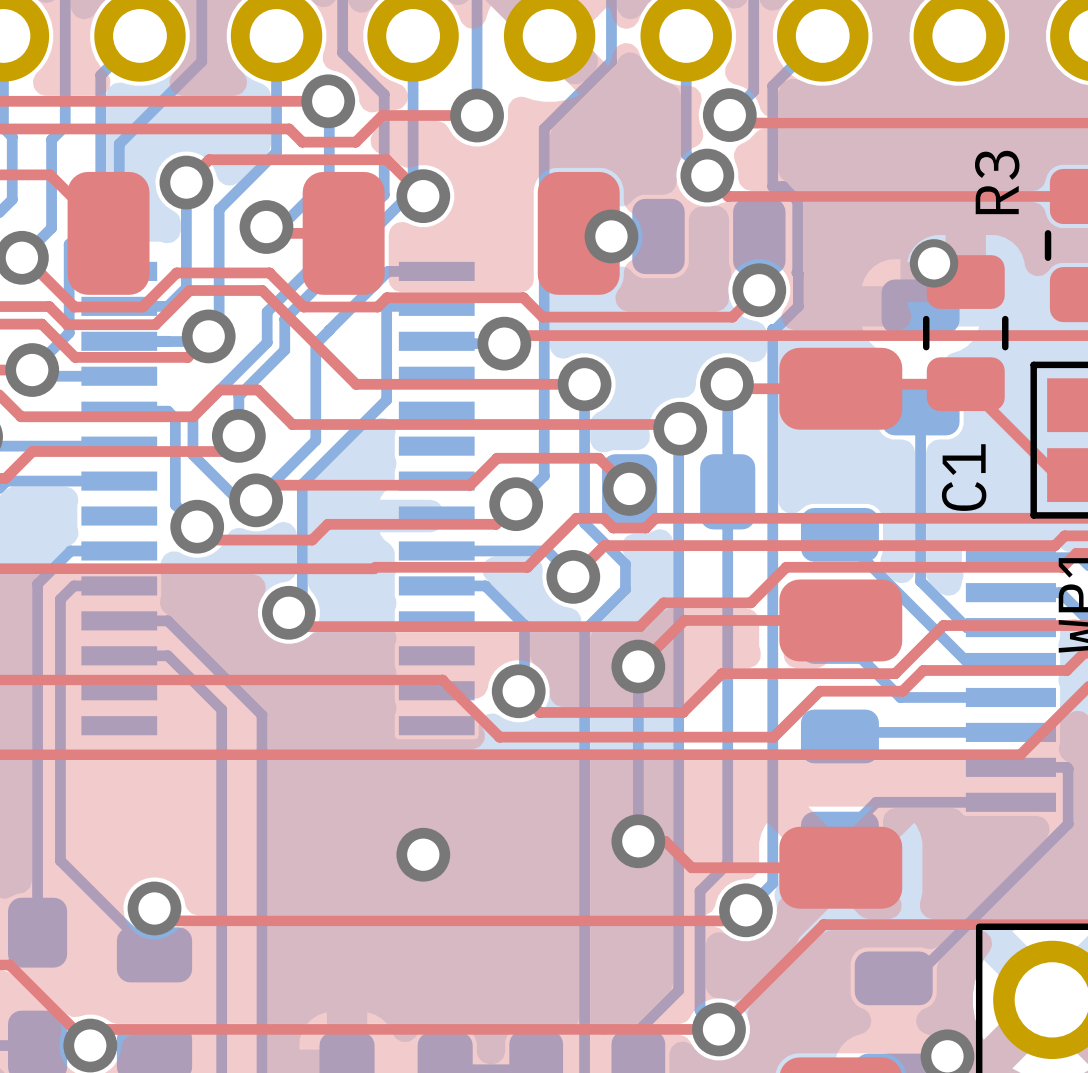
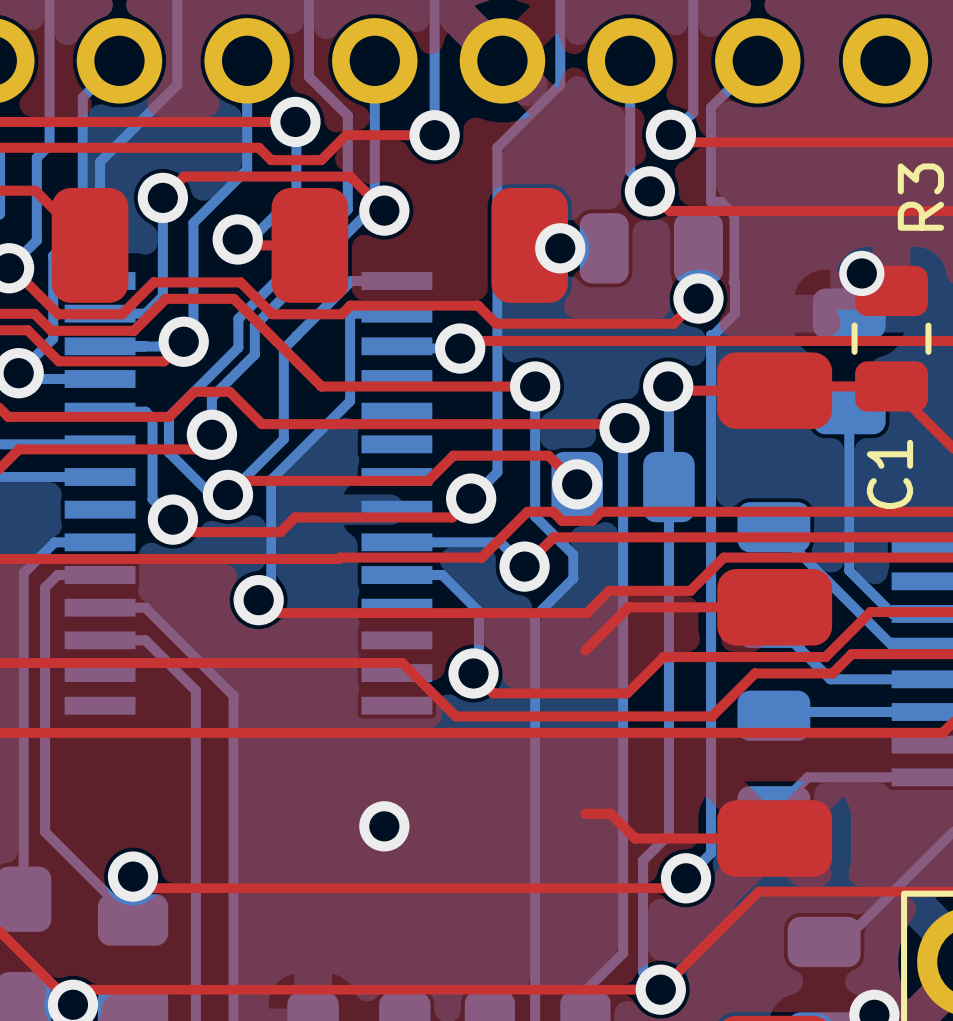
bottom track: (638, 666) (638, 841) -> none
via: (638, 666) -> none
via: (638, 841) -> none

